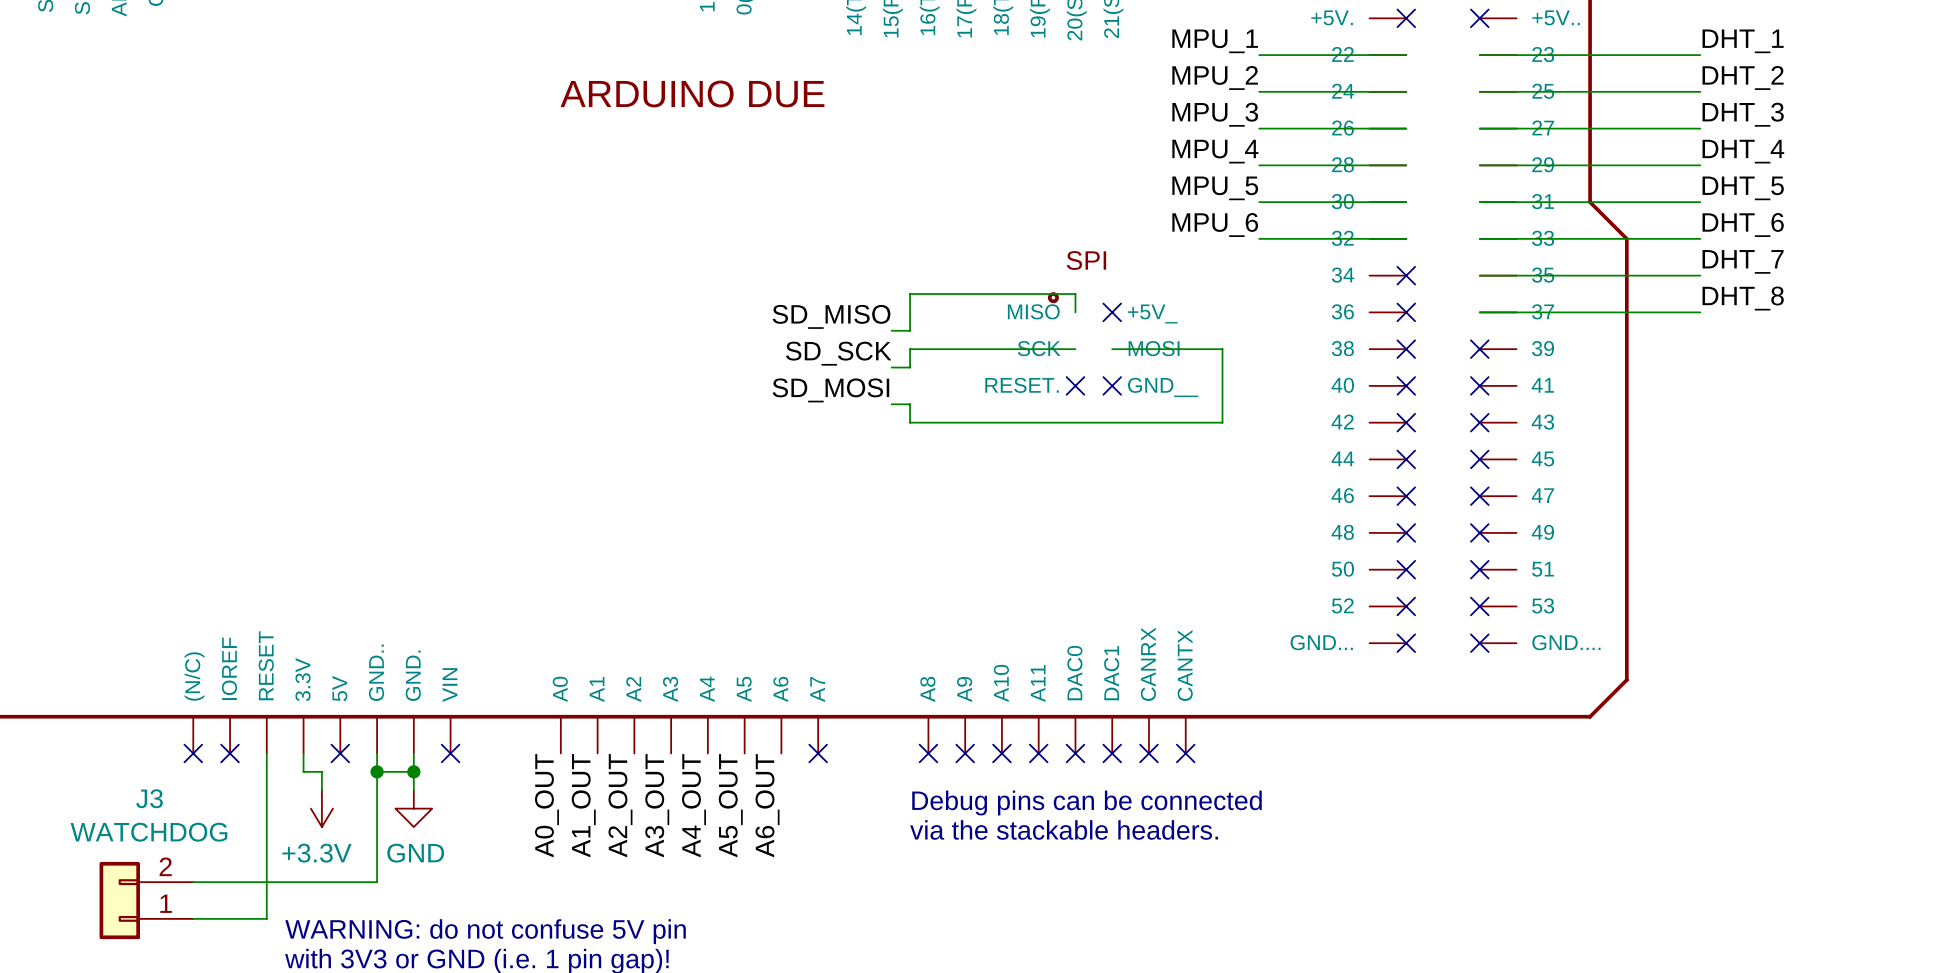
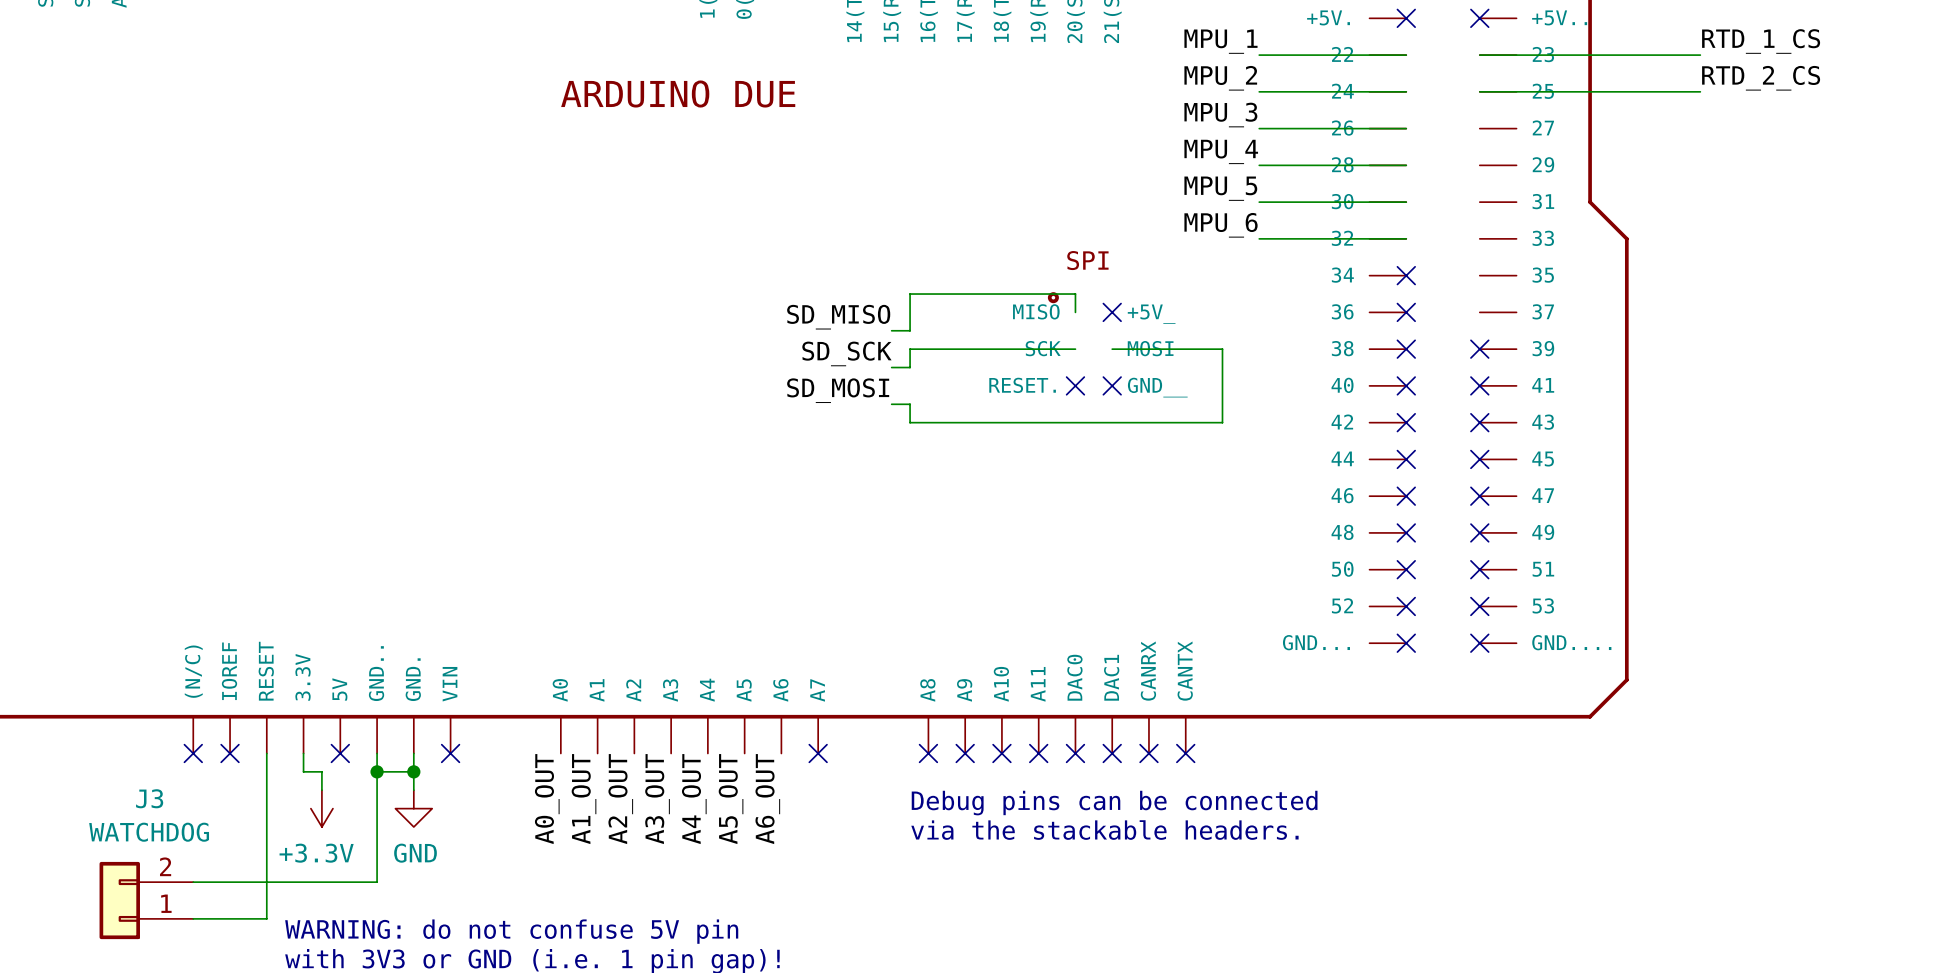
label: DHT_1 (1743, 41) -> RTD_1_CS (1761, 41)
label: DHT_2 (1743, 77) -> RTD_2_CS (1761, 78)
label: DHT_3 (1743, 114) -> none
wire: (1479, 128) (1700, 128) -> none
label: DHT_4 (1743, 151) -> none
wire: (1479, 165) (1700, 165) -> none
label: DHT_5 (1743, 188) -> none
wire: (1479, 202) (1700, 202) -> none
label: DHT_6 (1743, 224) -> none
wire: (1479, 238) (1700, 238) -> none
label: DHT_7 (1743, 261) -> none
wire: (1479, 275) (1700, 275) -> none
label: DHT_8 (1743, 298) -> none
wire: (1479, 312) (1700, 312) -> none

